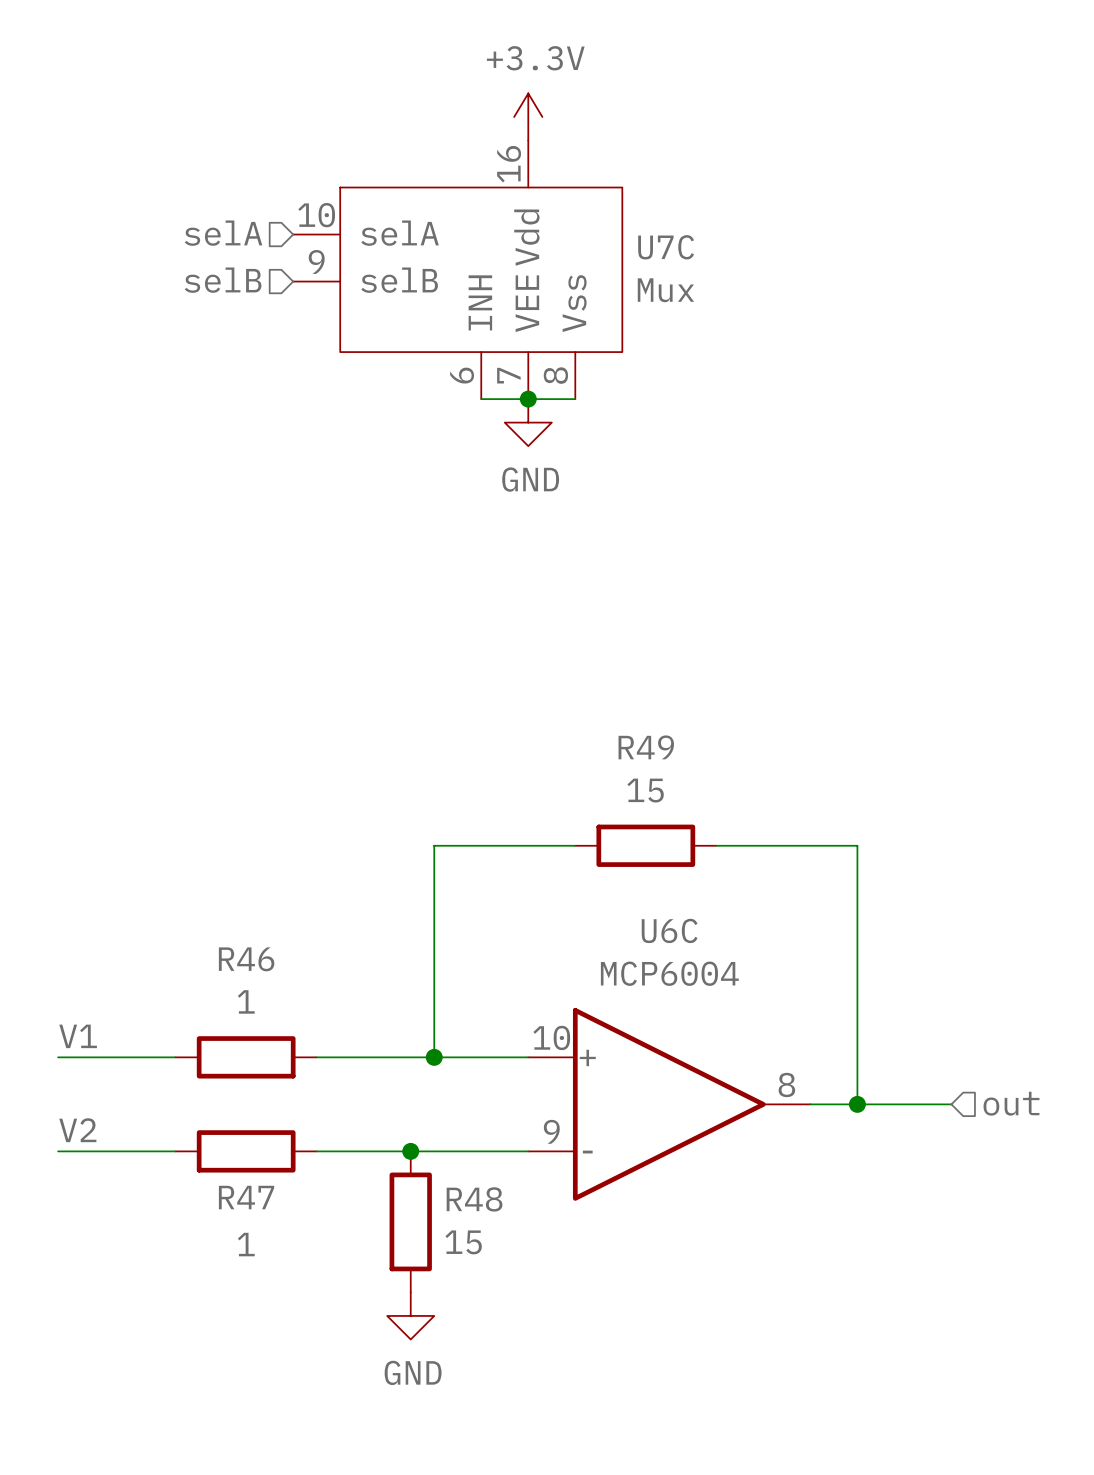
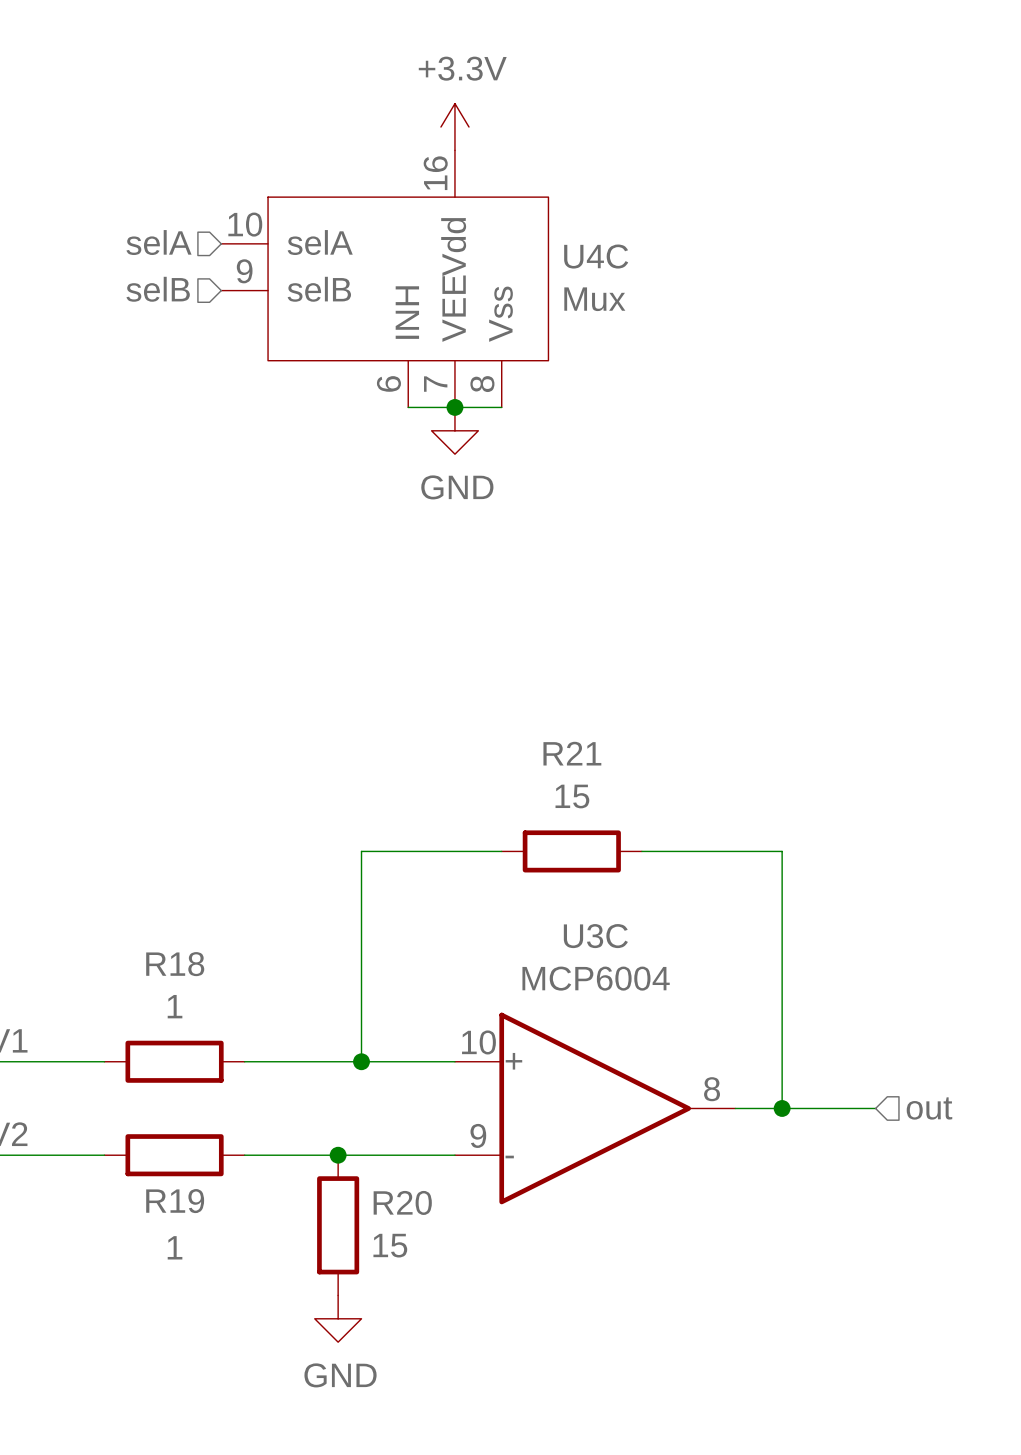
U7C name: U7C (666, 247) -> U4C (596, 256)
R49 name: R49 (646, 747) -> R21 (572, 753)
U6C name: U6C (669, 930) -> U3C (595, 936)
R46 name: R46 (246, 959) -> R18 (175, 964)
R47 name: R47 (246, 1197) -> R19 (175, 1201)
R48 name: R48 (474, 1199) -> R20 (402, 1202)

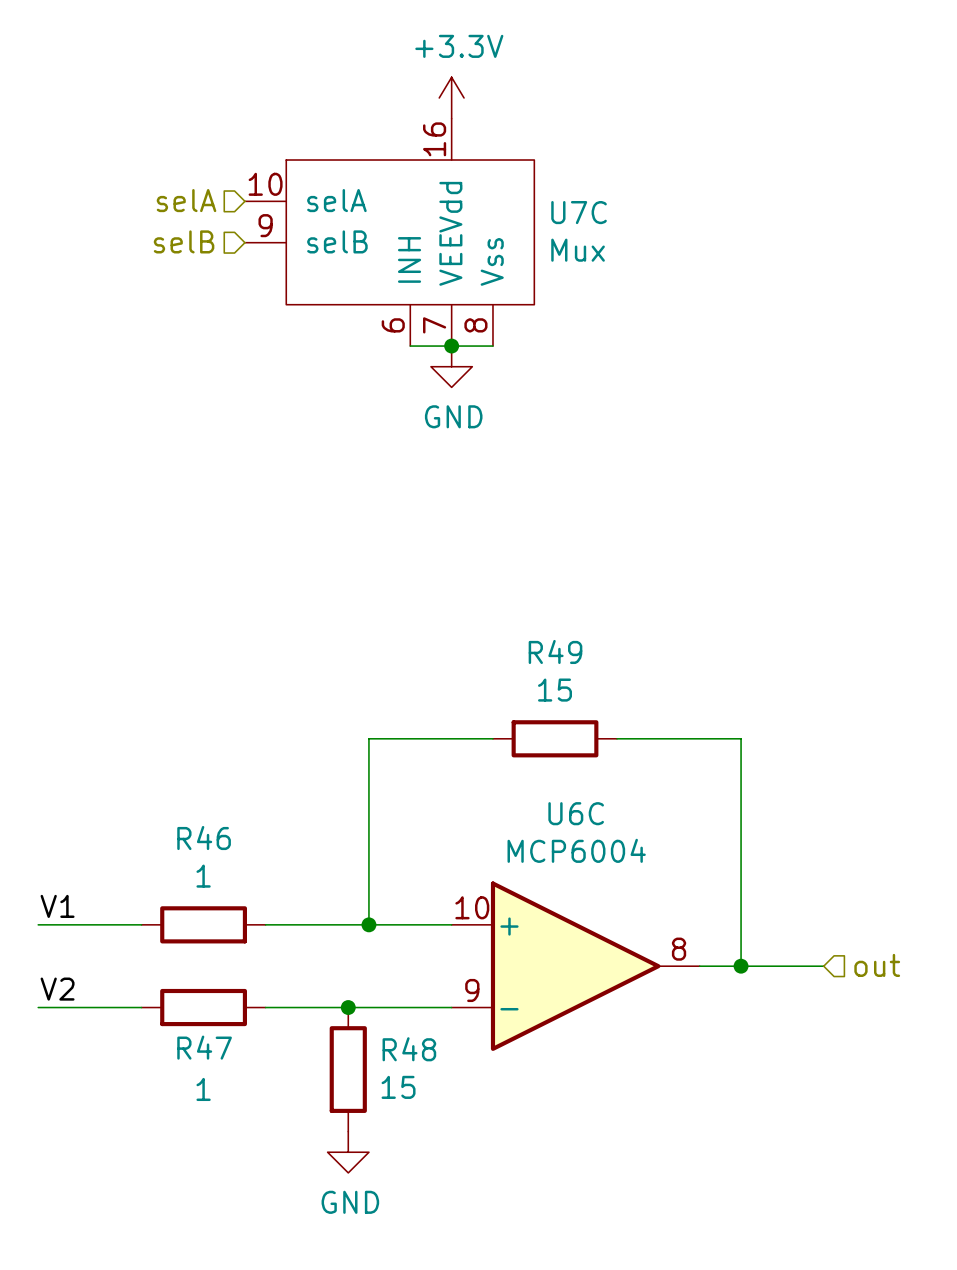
U4C name: U4C (596, 256) -> U7C (579, 212)
R21 name: R21 (572, 753) -> R49 (555, 651)
U3C name: U3C (595, 936) -> U6C (576, 813)
R18 name: R18 (175, 964) -> R46 (204, 838)
R19 name: R19 (175, 1201) -> R47 (204, 1047)
R20 name: R20 (402, 1202) -> R48 (409, 1049)

